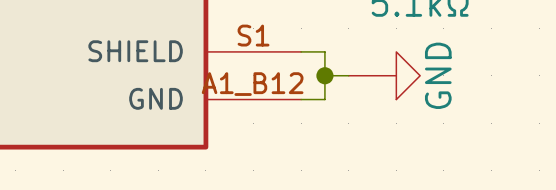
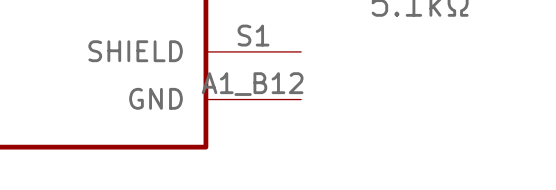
wire: (301, 51) (324, 51) (324, 99) (301, 99) -> none
wire: (324, 75) (348, 75) -> none
junction: (324, 75) -> none
power symbol: GND (384, 75) -> none

